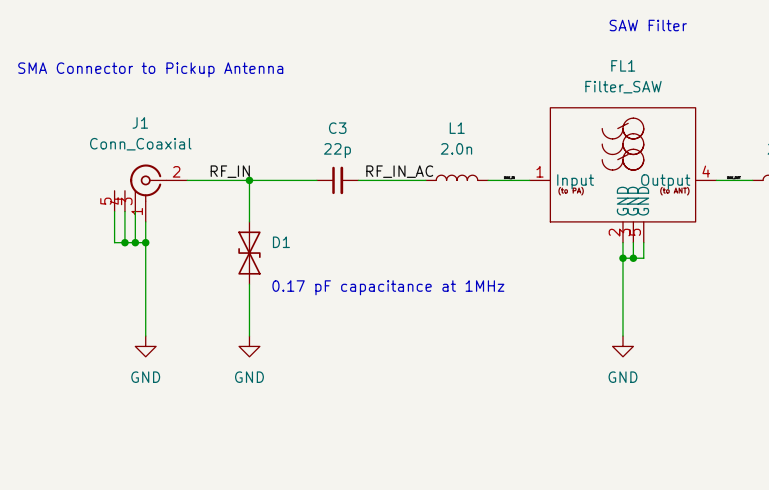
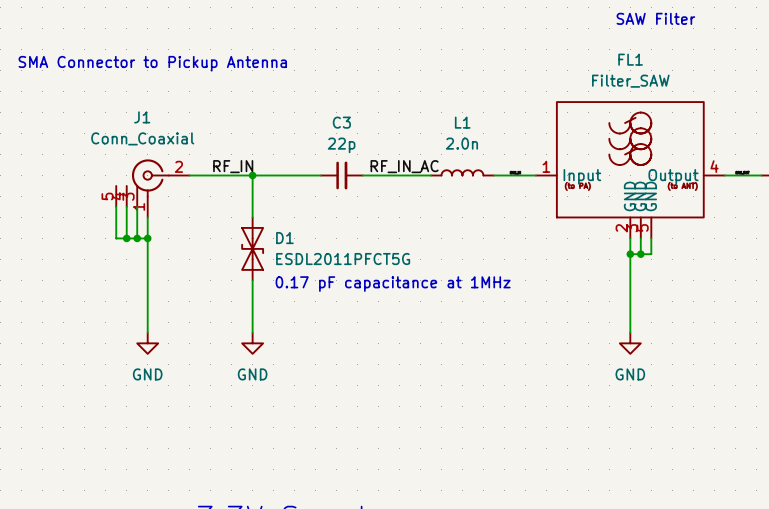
D1 value: none -> ESDL2011PFCT5G (343, 259)

